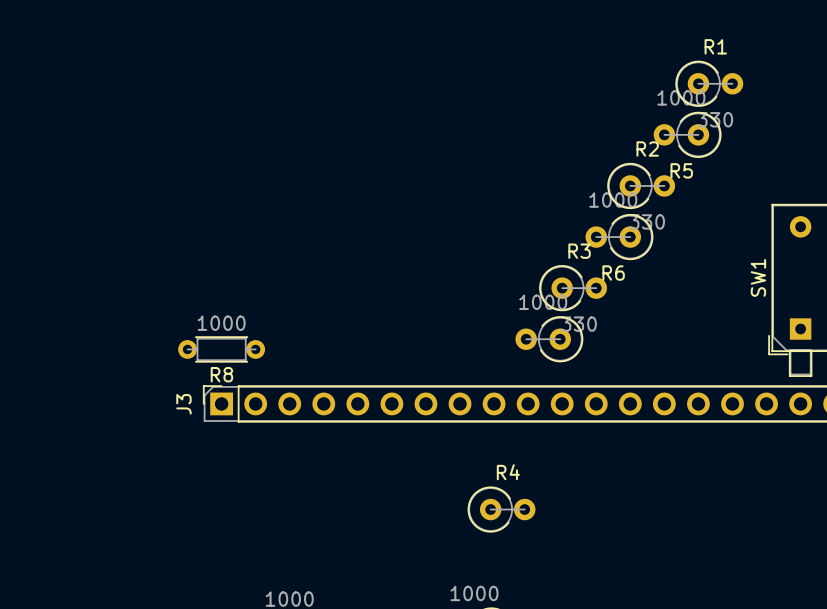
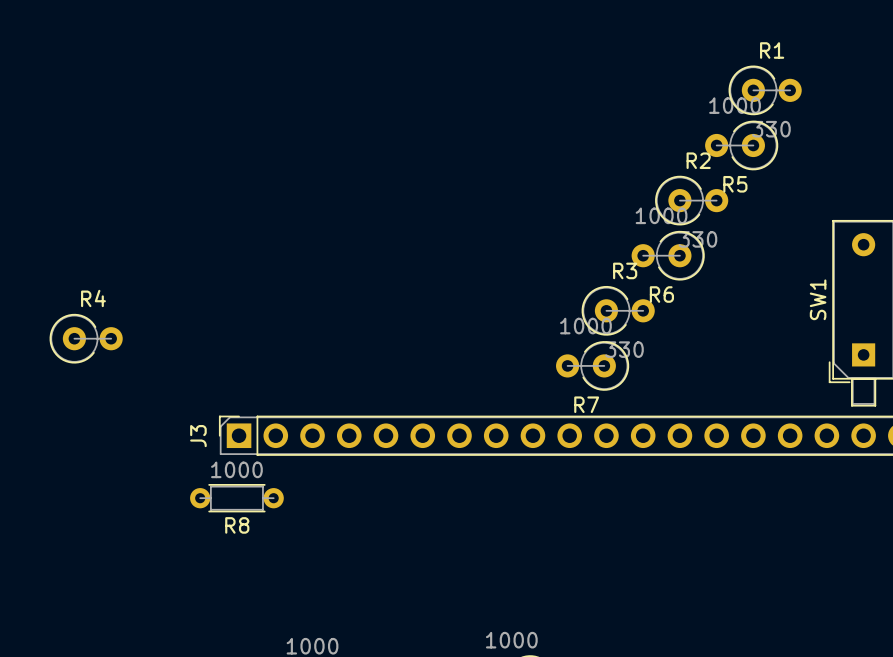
R8 position: (221, 349) -> (236, 498)
R7 name: none -> R7 (586, 404)
R4 position: (501, 509) -> (86, 338)

